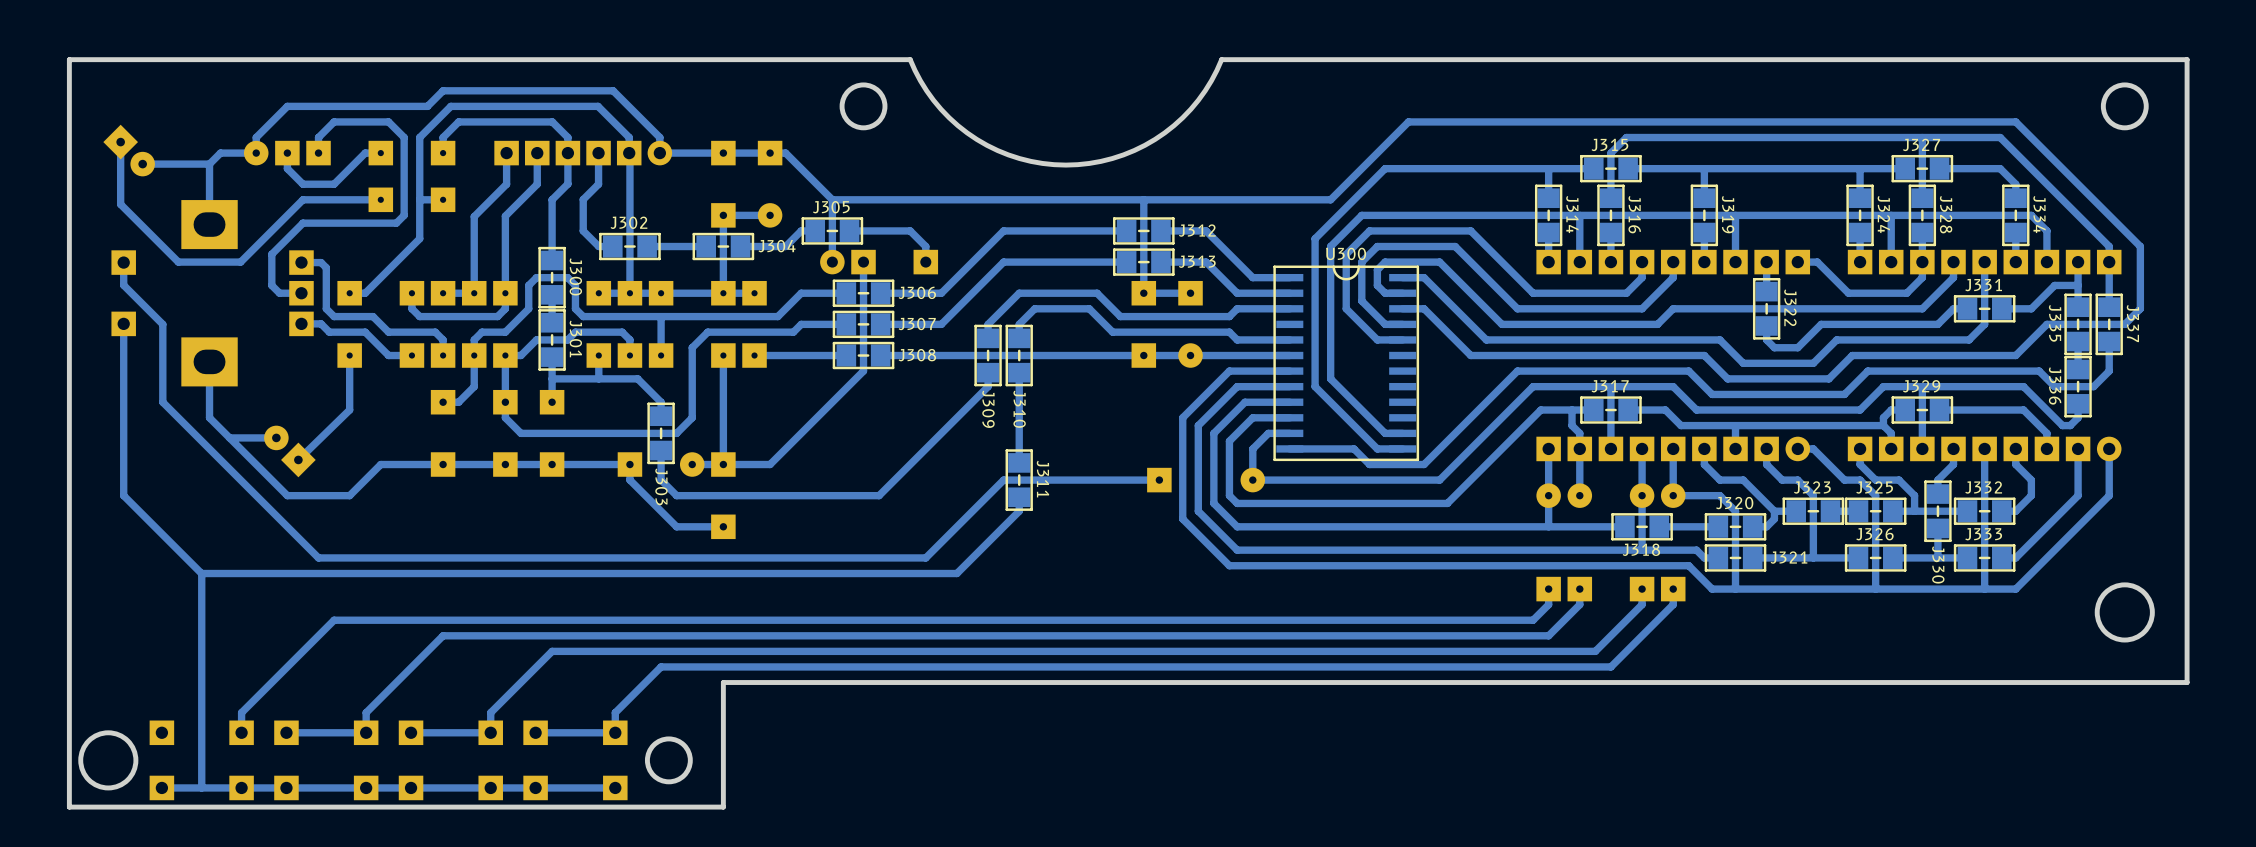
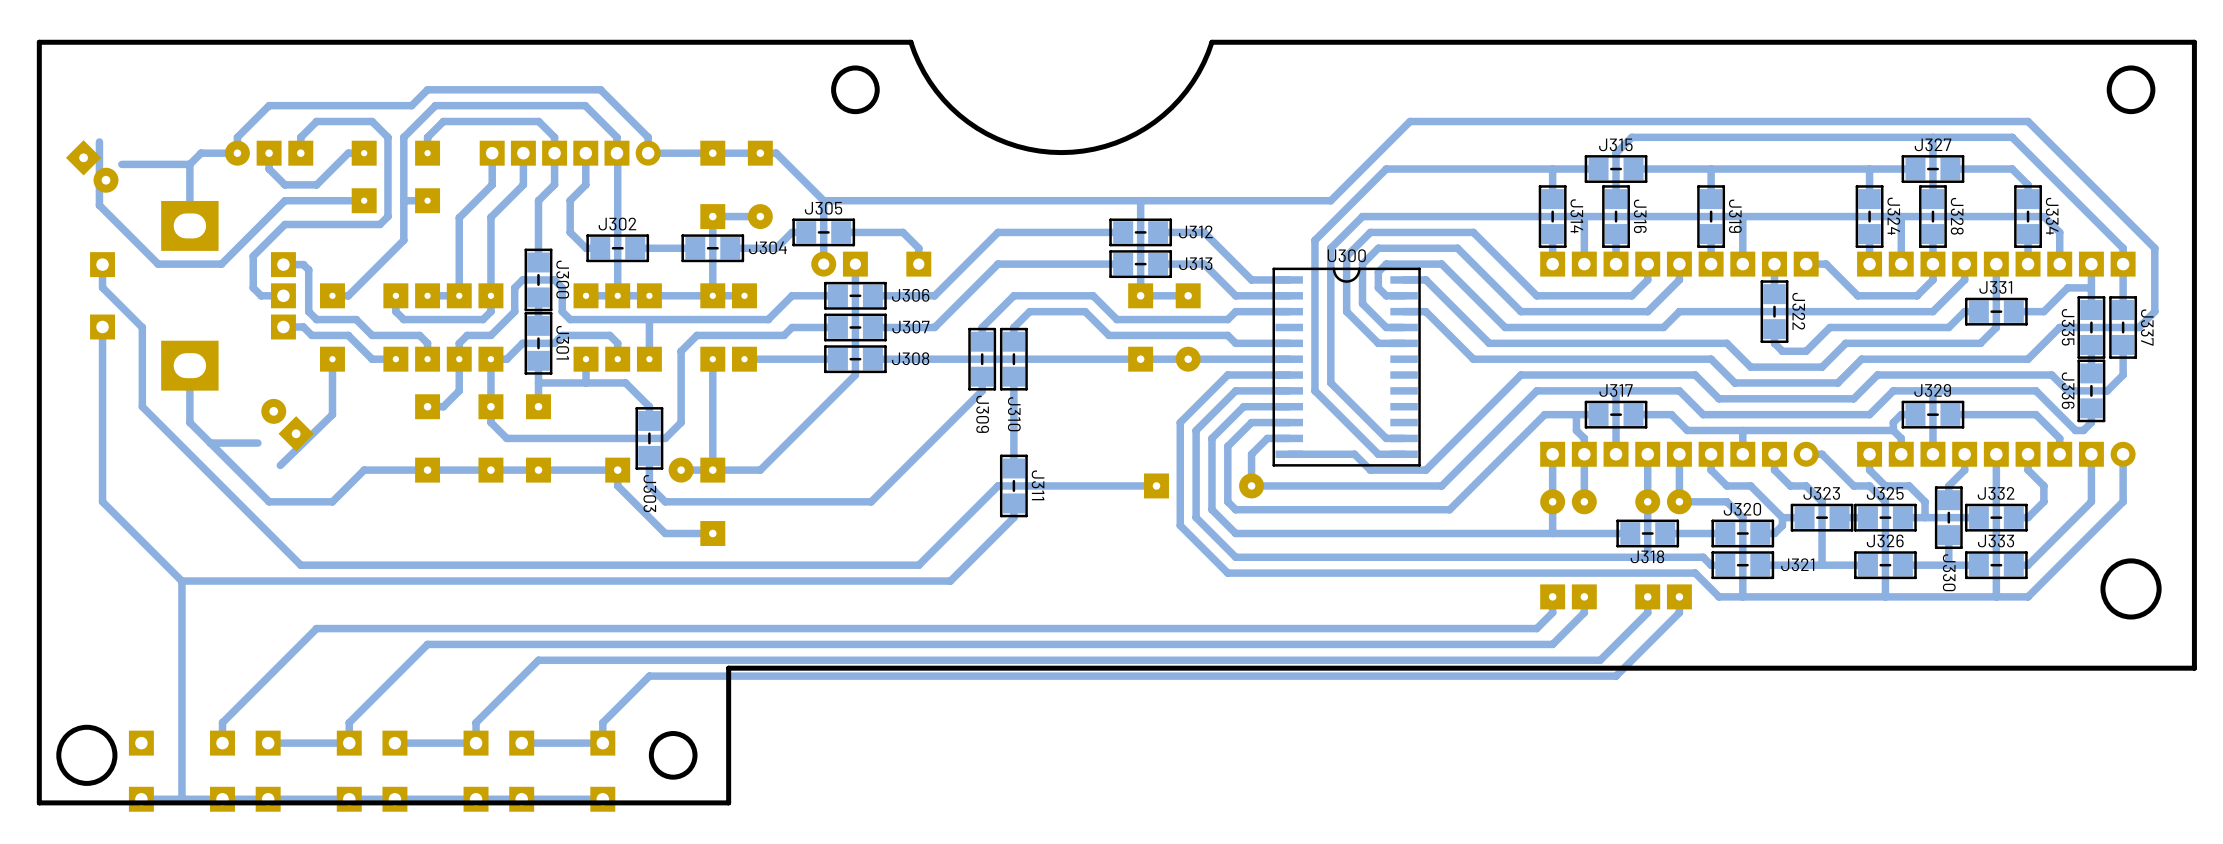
board edge: (2187, 59) (2187, 682) (723, 682) (723, 807) (69, 807) (69, 59) (910, 59) (926, 90) (941, 109) (957, 125) (976, 139) (997, 150) (1019, 158) (1042, 163) (1065, 165) (1089, 163) (1112, 158) (1134, 150) (1155, 139) (1174, 125) (1198, 100) (1211, 80) (1221, 59) (2187, 59) -> (2194, 42) (2194, 668) (728, 668) (728, 802) (39, 802) (39, 42) (910, 42) (919, 62) (929, 82) (951, 107) (968, 122) (986, 133) (1007, 142) (1028, 149) (1061, 152) (1094, 149) (1115, 142) (1135, 133) (1154, 122) (1171, 107) (1192, 82) (1203, 62) (1211, 42) (2194, 42)
round board edge position: (863, 106) -> (855, 89)
round board edge position: (2124, 106) -> (2131, 89)
part position: (129, 150) -> (92, 166)
part position: (289, 451) -> (287, 425)
round board edge position: (2124, 612) -> (2131, 588)
round board edge position: (108, 760) -> (86, 755)
round board edge position: (668, 760) -> (673, 755)

